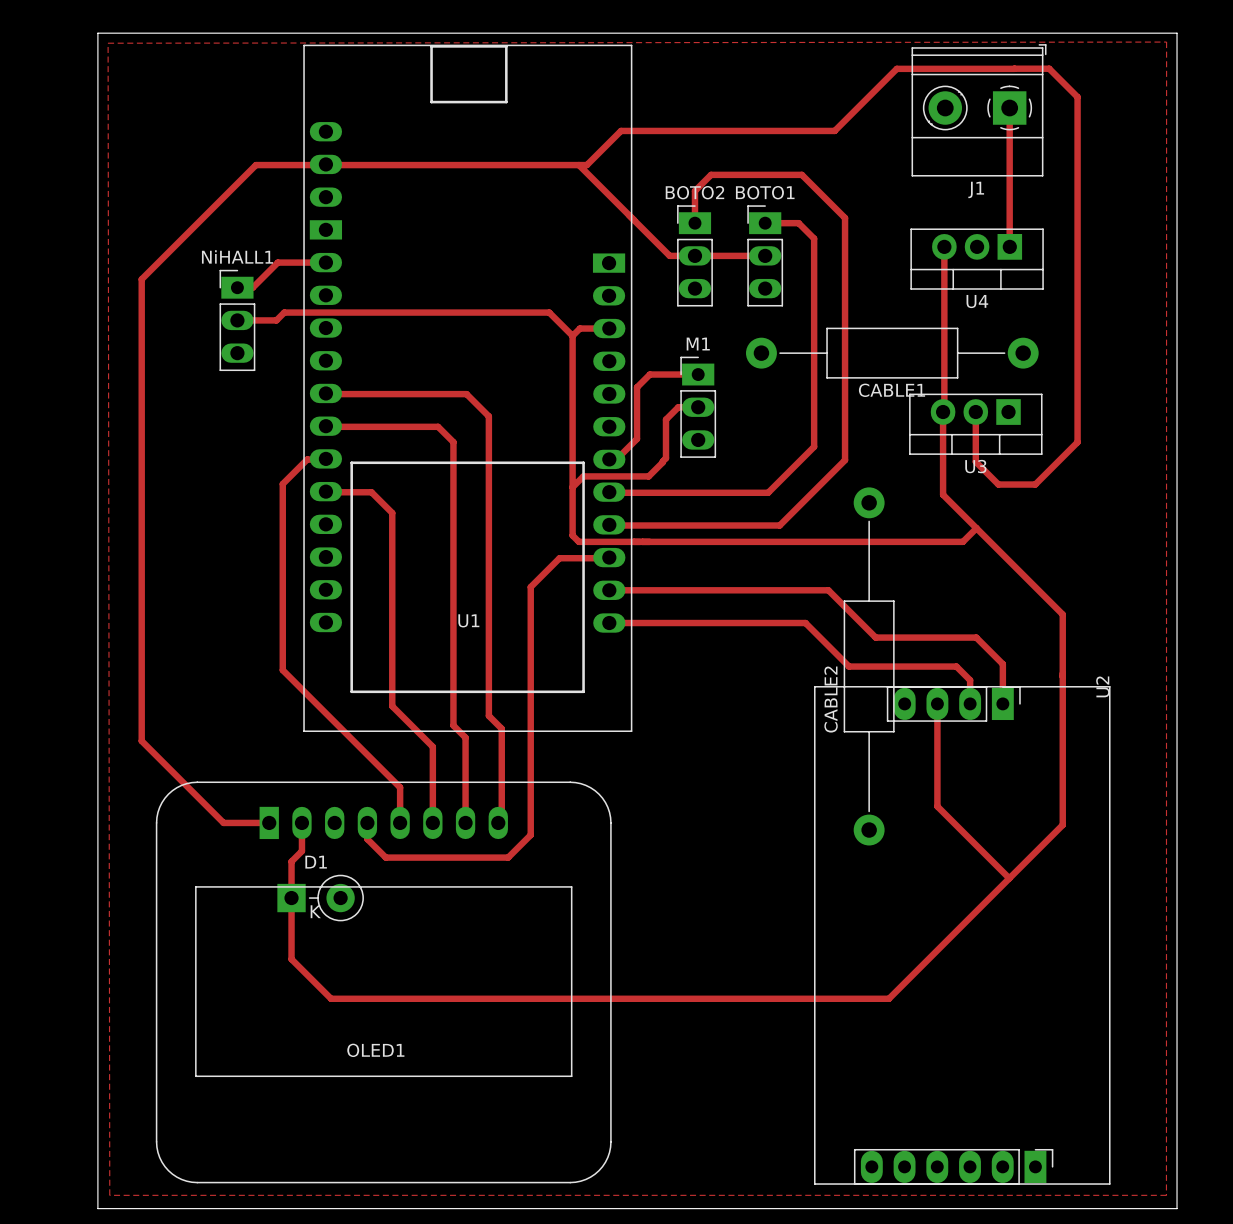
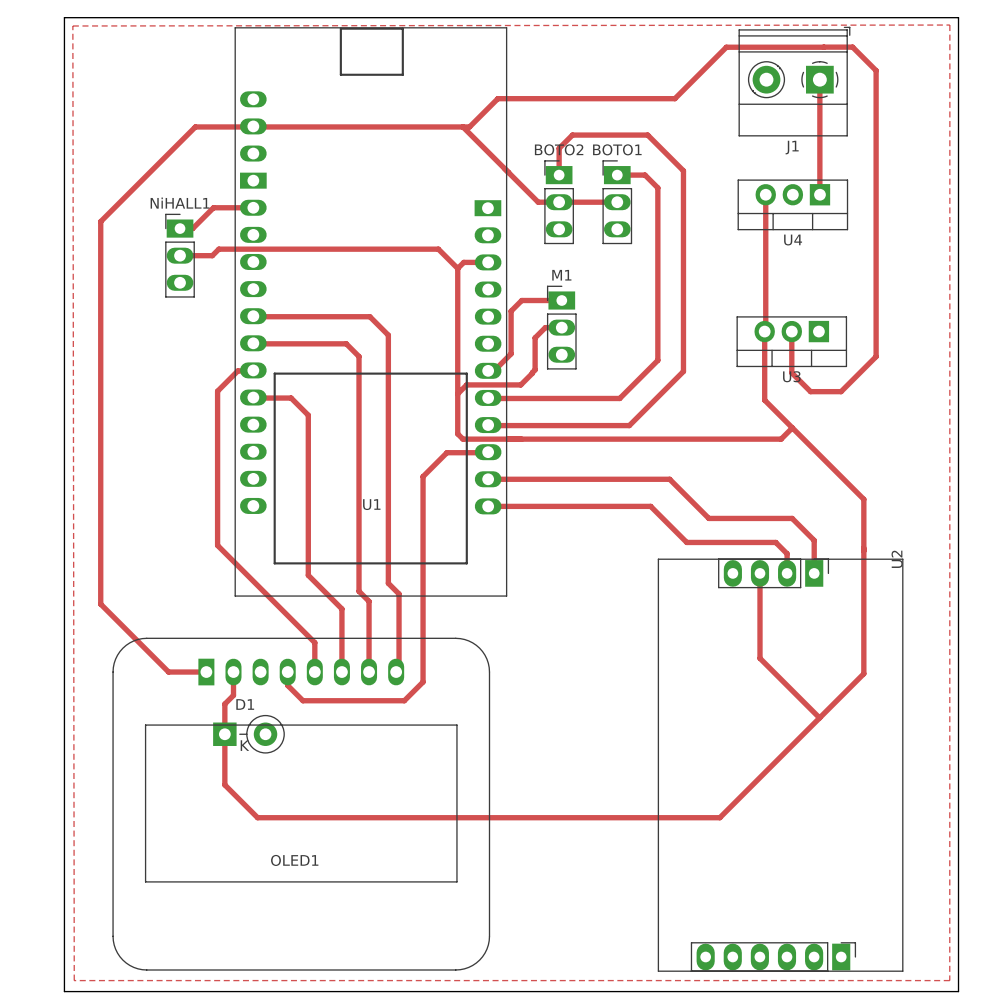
CABLE1: (892, 353) -> none
CABLE2: (869, 666) -> none

